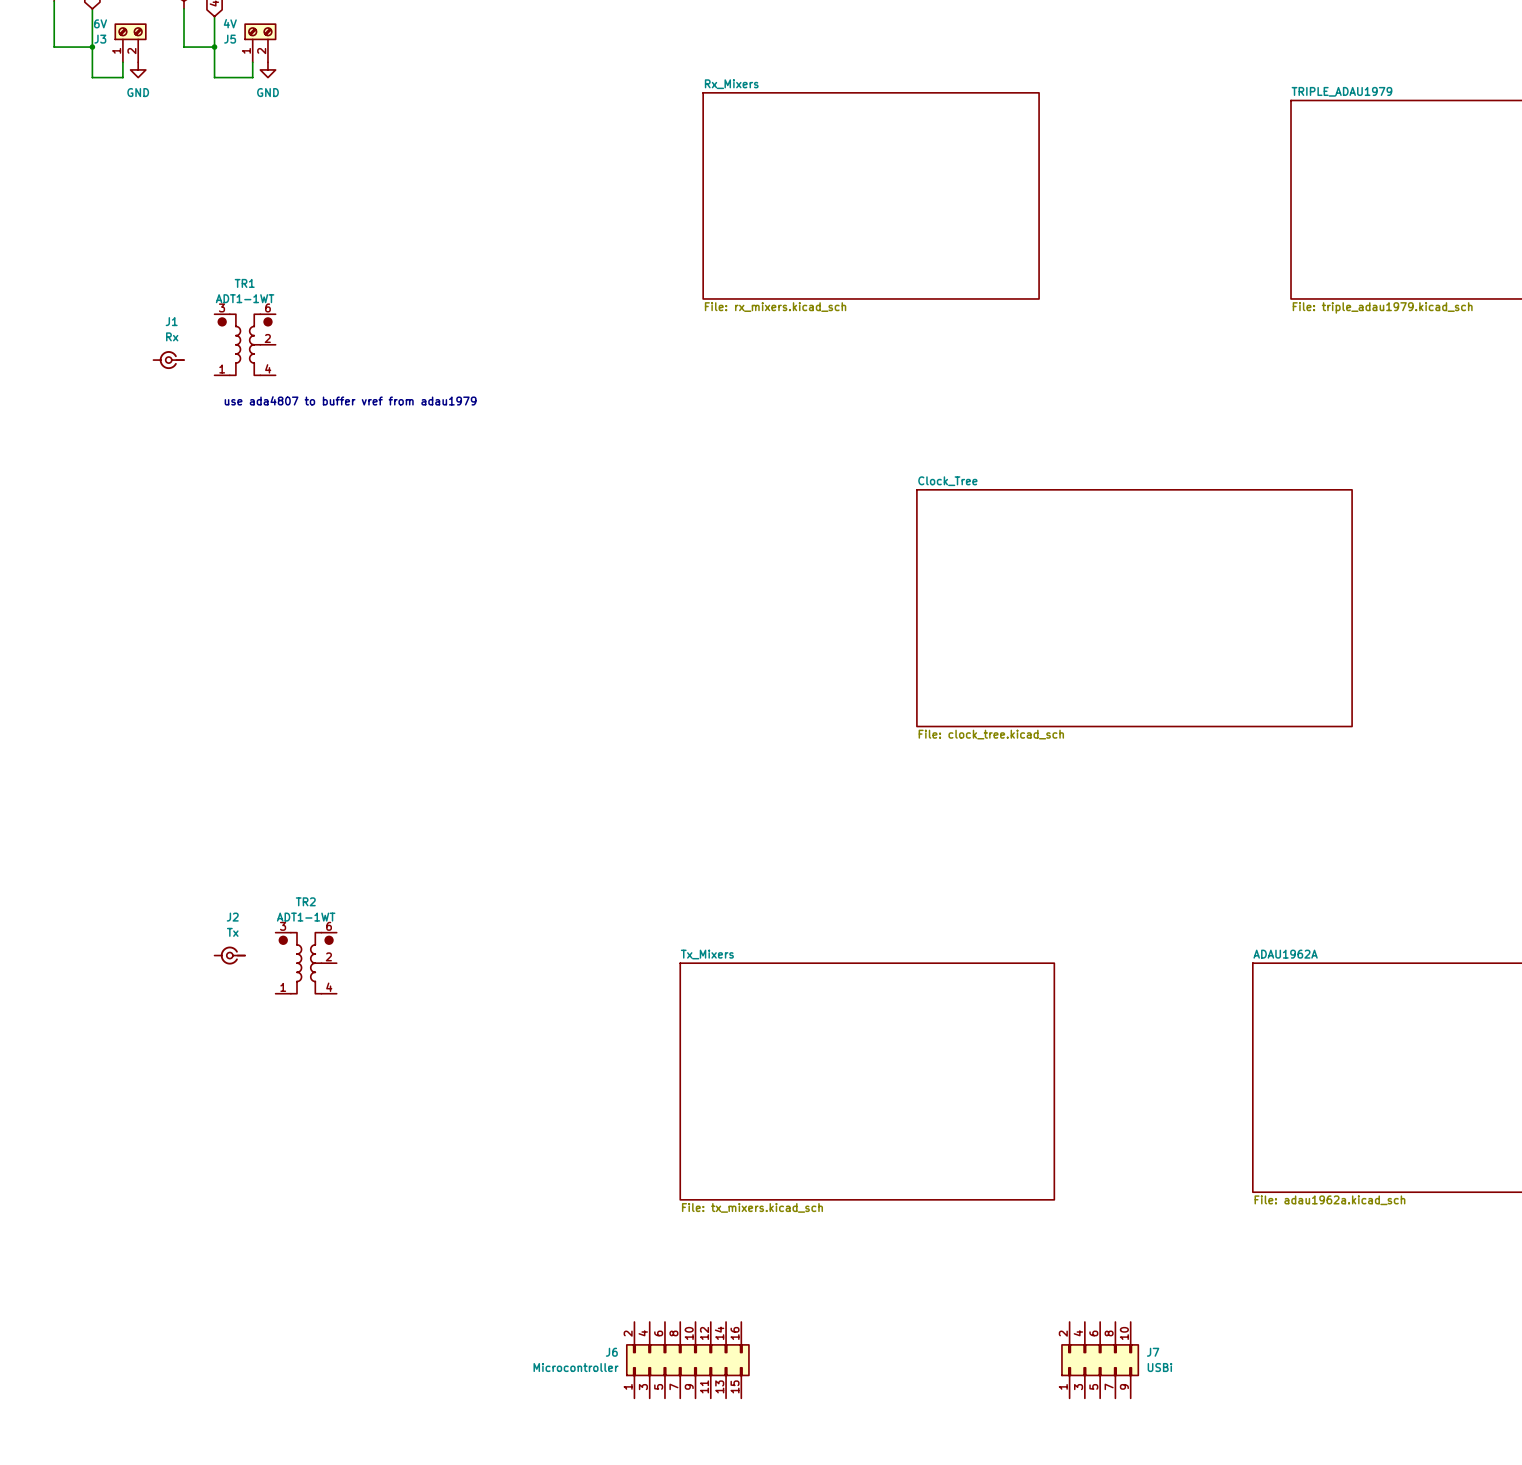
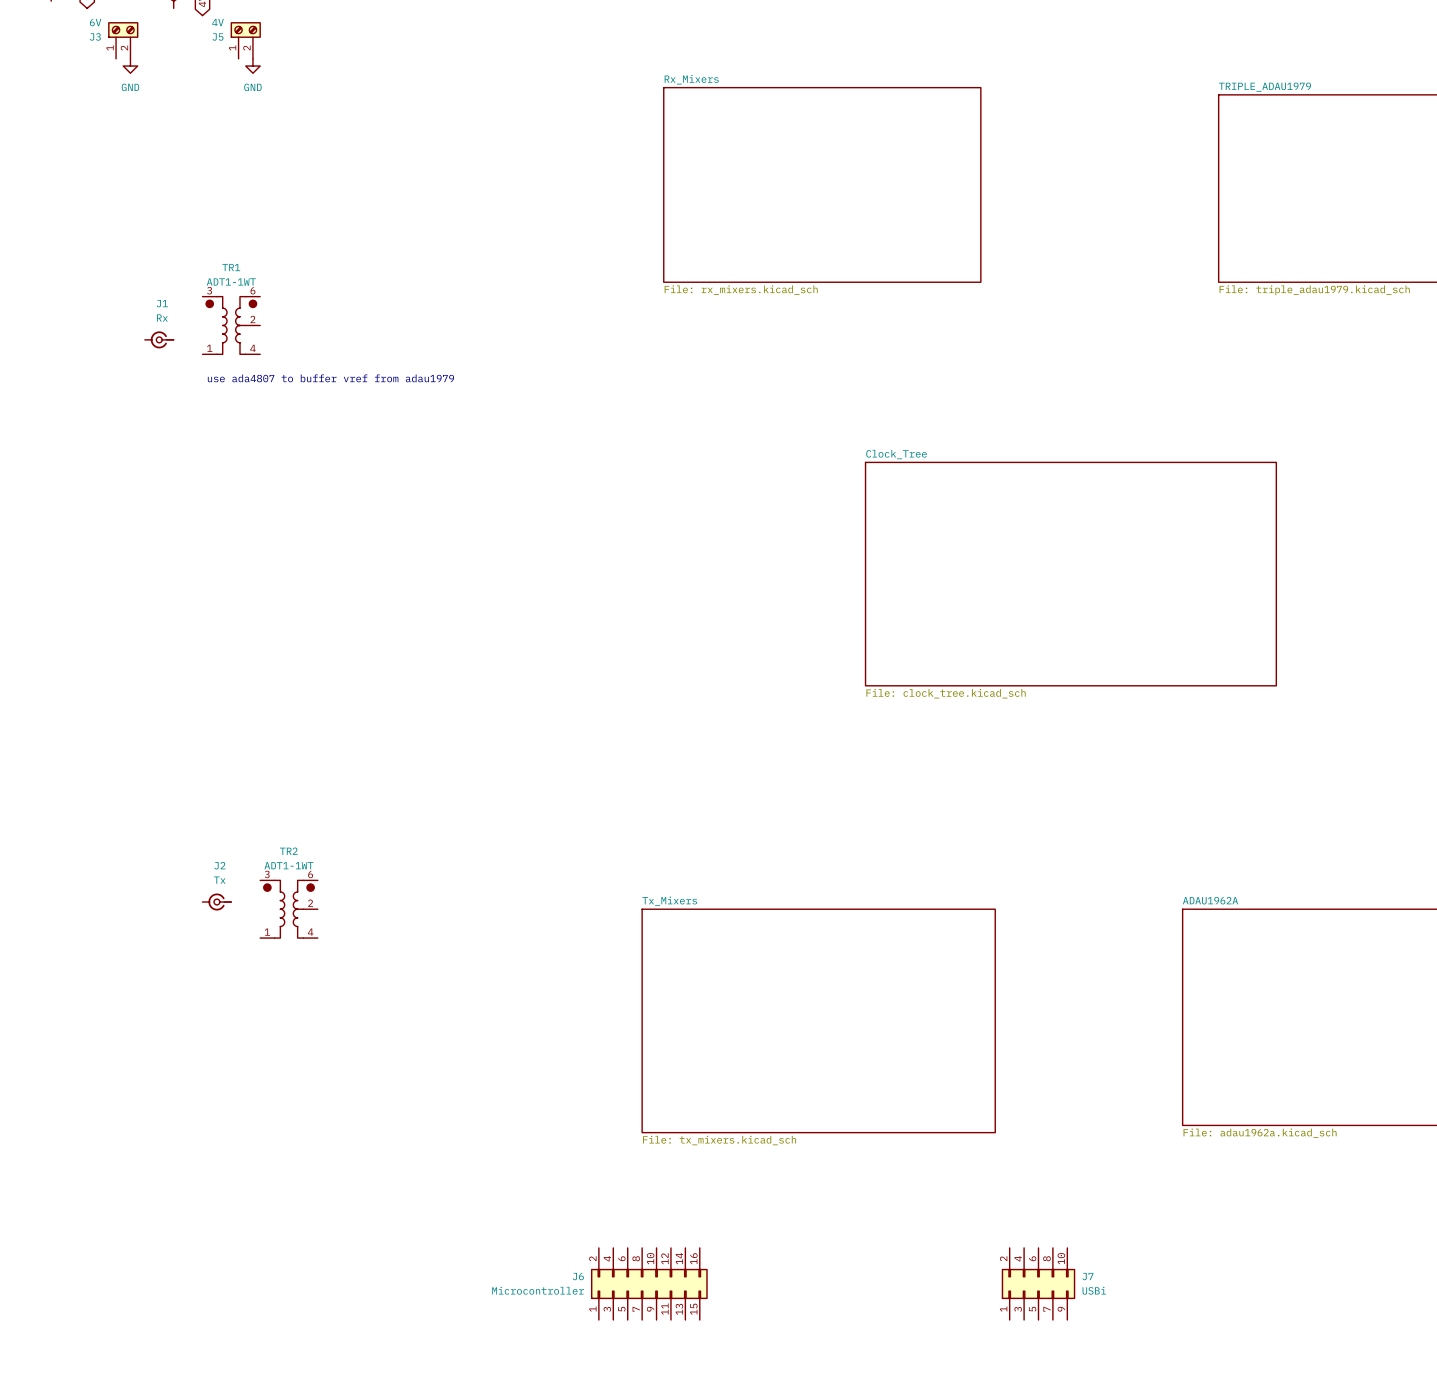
wire: (54, 1) (54, 47) (92, 47) -> none
wire: (92, 8) (92, 77) (122, 77) (122, 62) -> none
wire: (184, 8) (184, 47) (214, 47) -> none
wire: (214, 16) (214, 77) (252, 77) (252, 62) -> none
junction: (92, 47) -> none
junction: (214, 47) -> none

